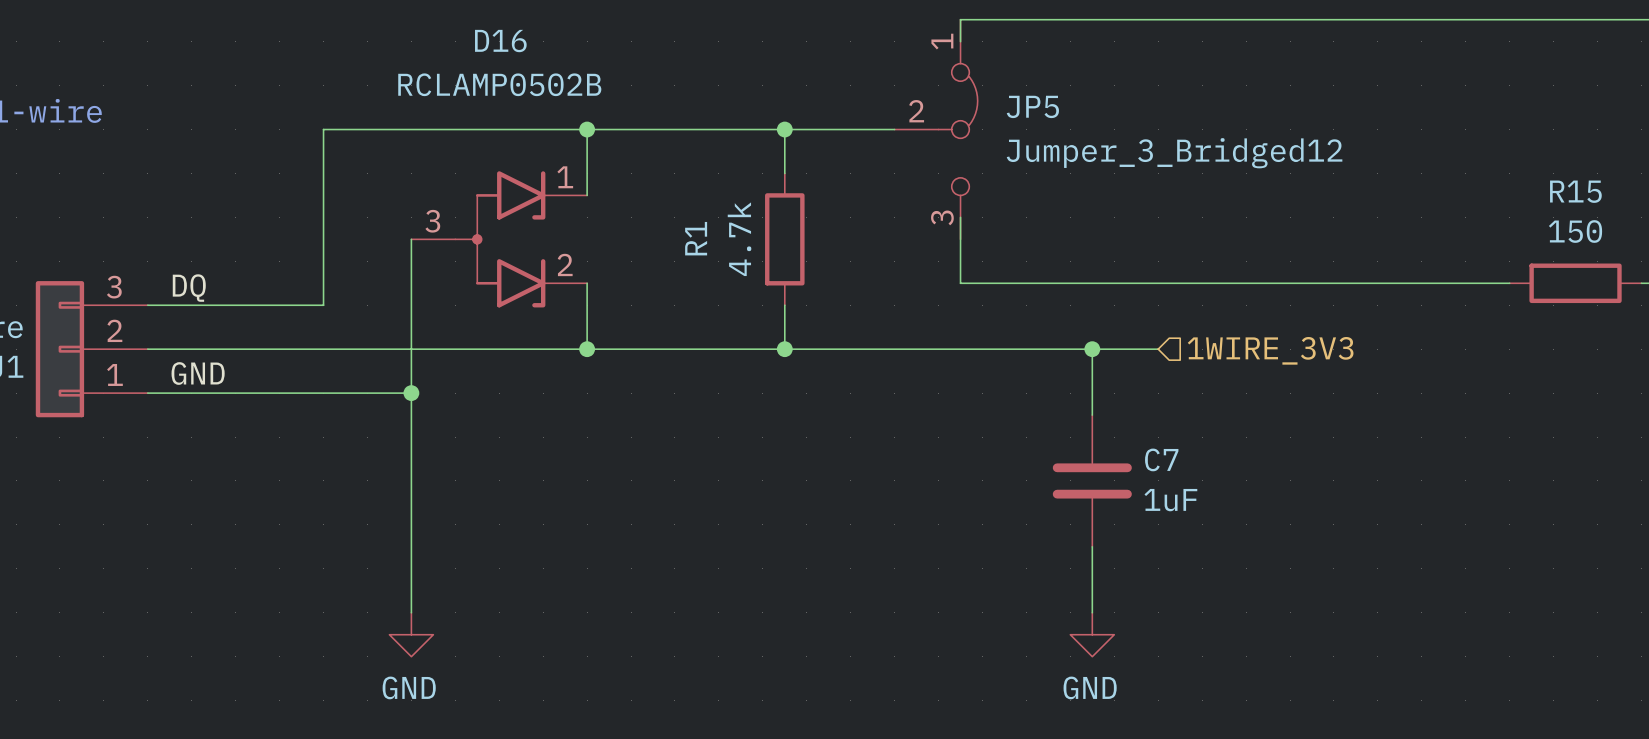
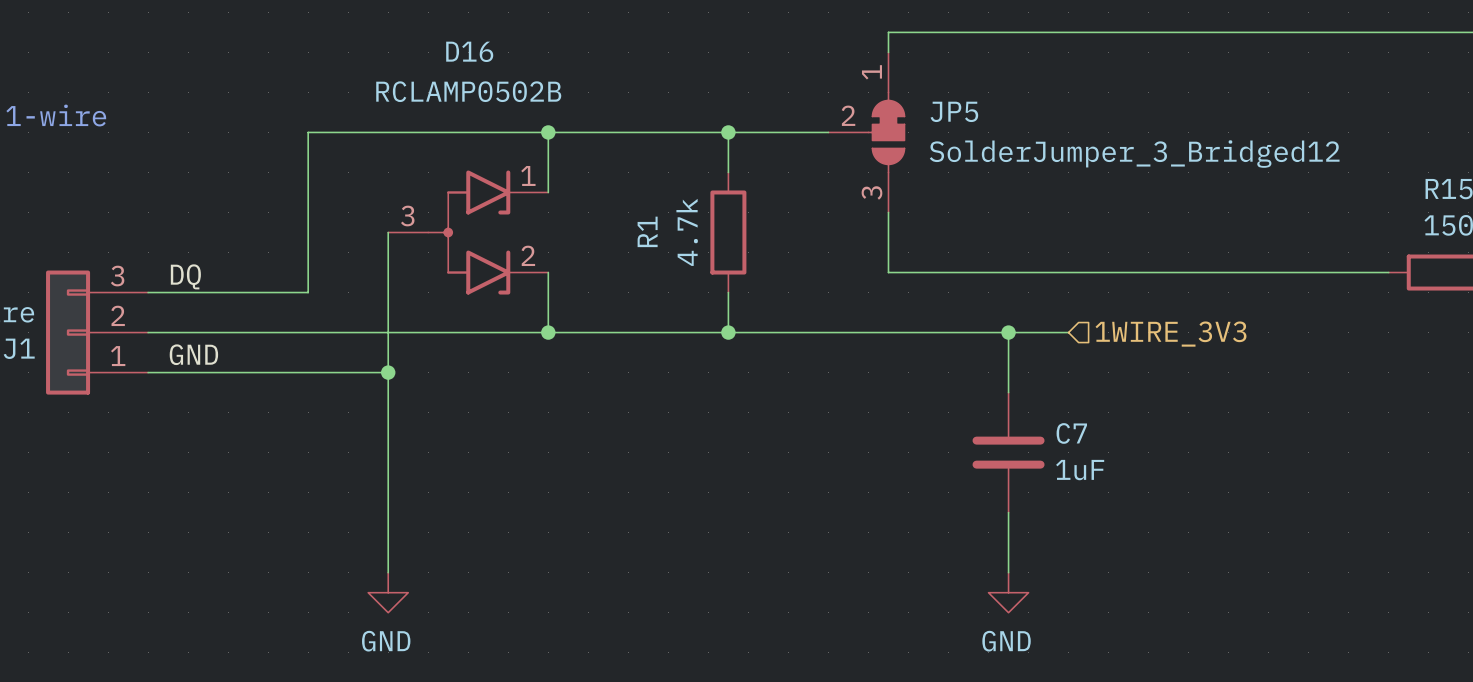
JP5 symbol: [894, 19, 978, 240] -> [828, 52, 905, 213]
JP5 value: Jumper_3_Bridged12 (1174, 153) -> SolderJumper_3_Bridged12 (1134, 154)

